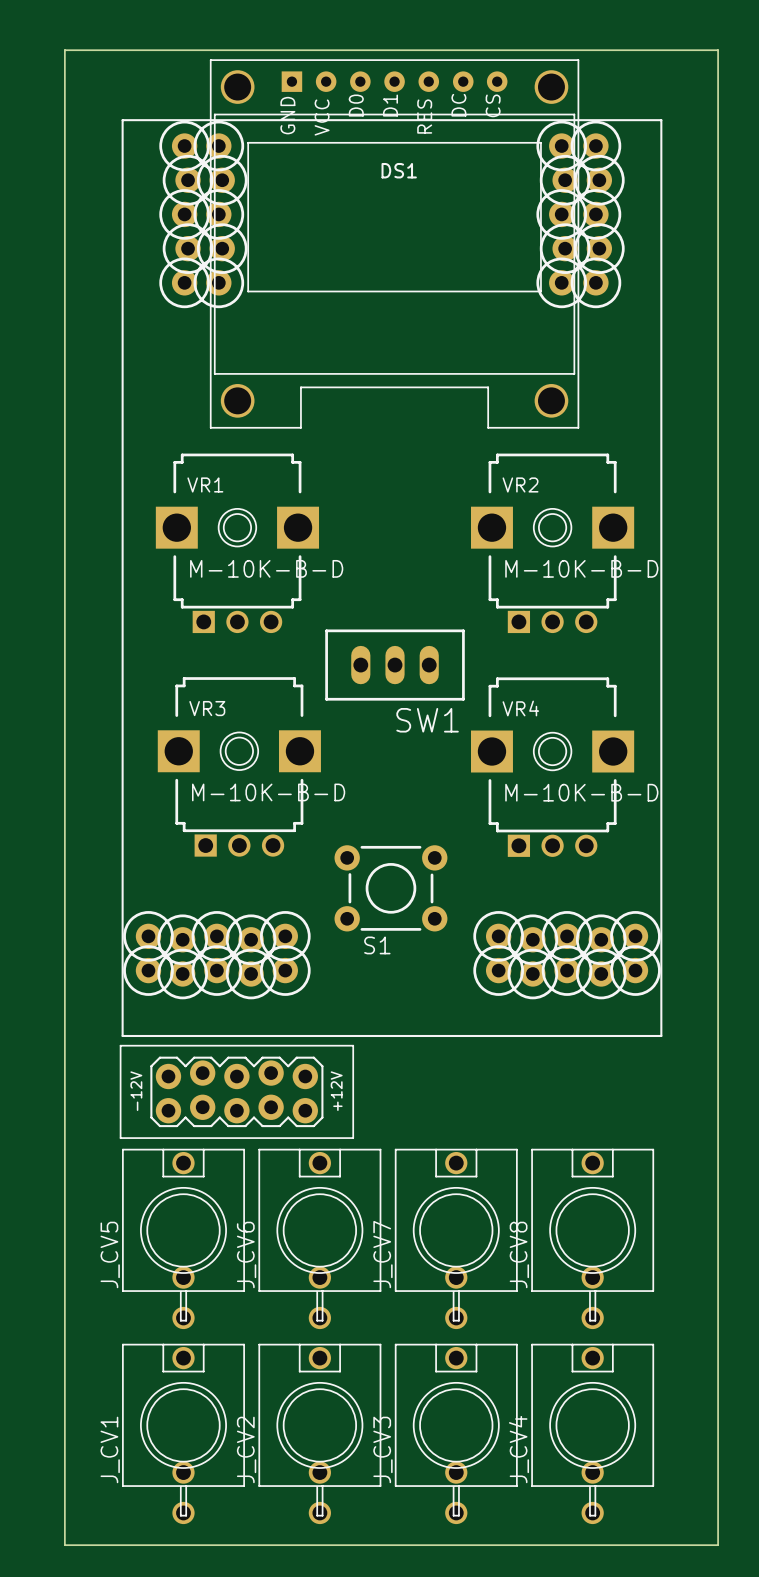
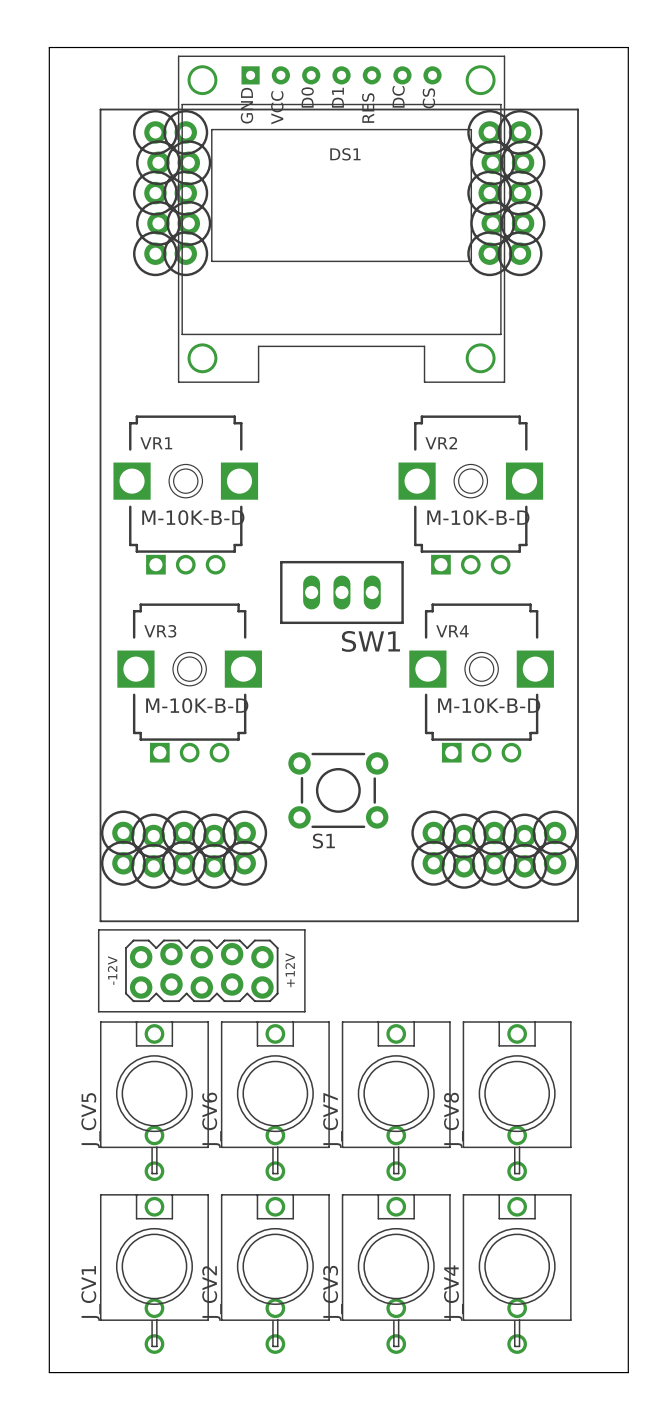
VR1 position: (237, 543) -> (185, 495)
VR2 position: (552, 543) -> (470, 495)
VR3 position: (239, 766) -> (189, 682)

